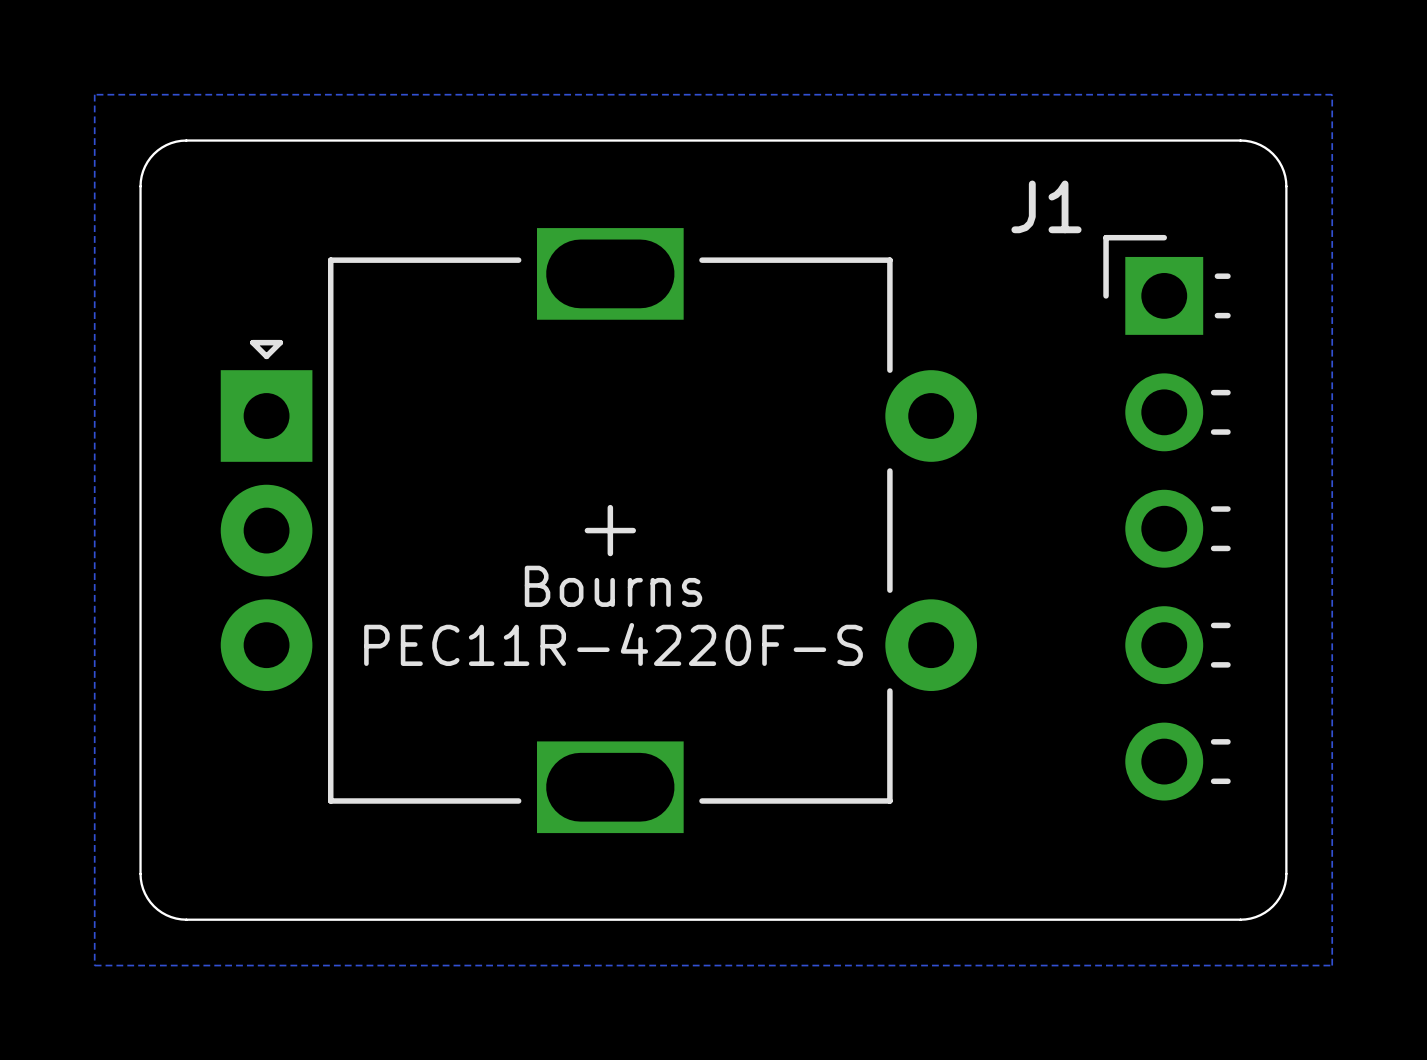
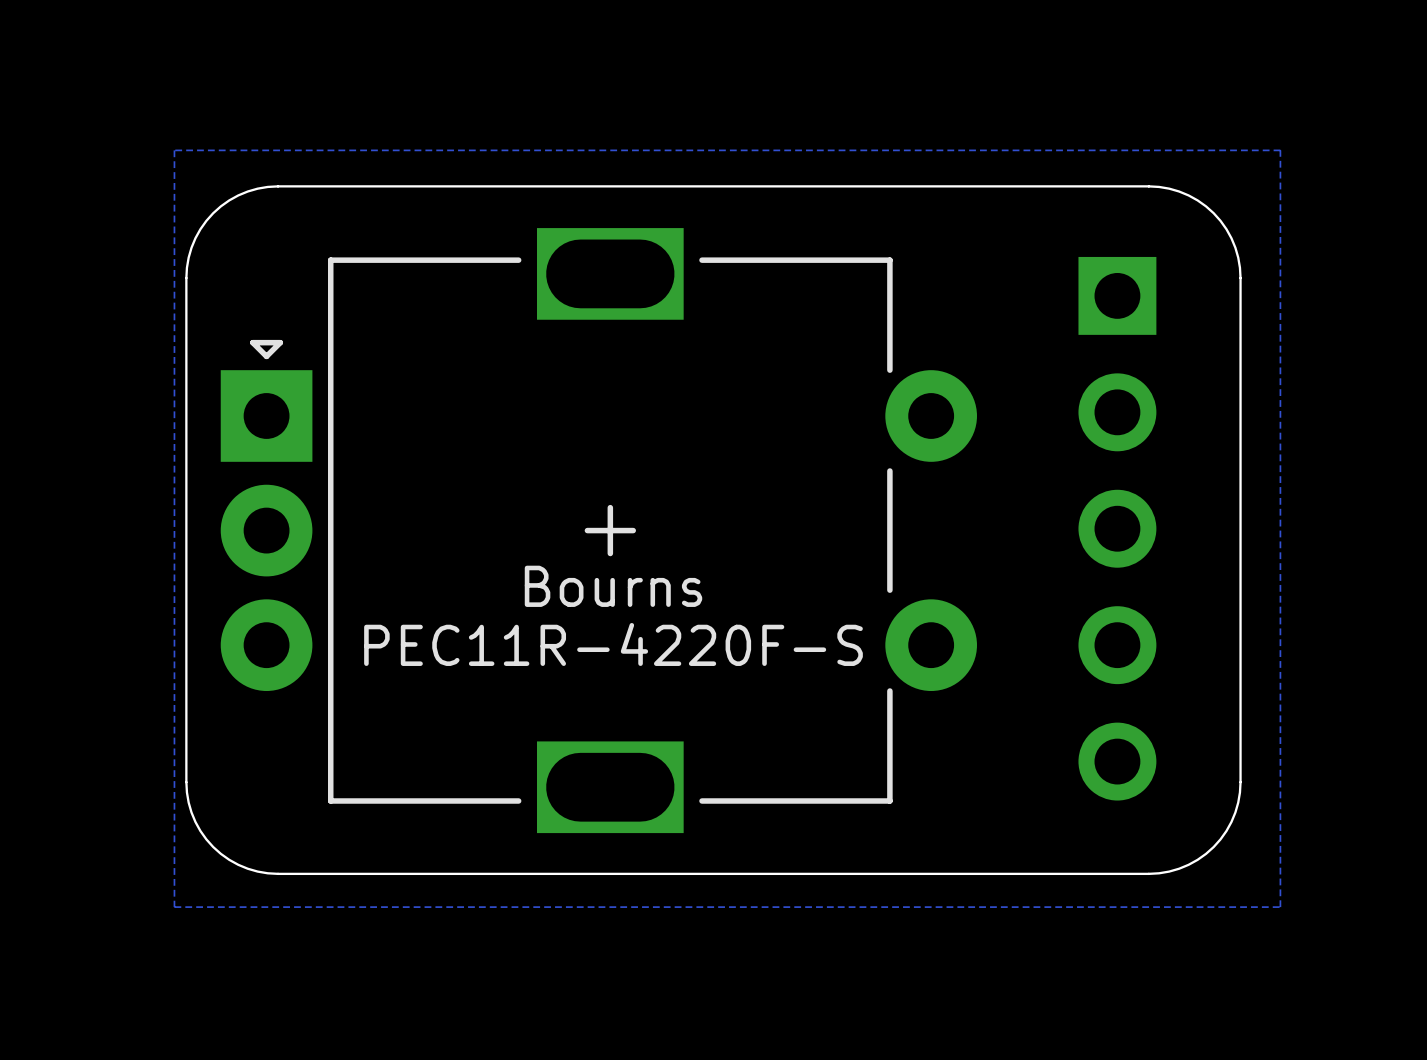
zone outline: (1332, 94) (94, 94) (94, 965) (1332, 965) (1332, 94) -> (1280, 150) (1280, 907) (174, 907) (174, 150) (1280, 150)
board edge: (1240, 140) (186, 140) (171, 143) (161, 147) (147, 161) (143, 171) (140, 186) (140, 873) (141, 884) (147, 898) (161, 912) (171, 917) (186, 919) (1240, 919) (1250, 918) (1264, 912) (1276, 902) (1281, 893) (1286, 873) (1286, 186) (1281, 166) (1272, 153) (1260, 145) (1240, 140) -> (1148, 186) (1169, 188) (1188, 195) (1213, 213) (1231, 238) (1239, 267) (1239, 792) (1235, 812) (1226, 830) (1213, 847) (1197, 859) (1169, 871) (1148, 873) (278, 873) (257, 871) (238, 864) (213, 847) (200, 830) (191, 812) (186, 782) (186, 278) (188, 257) (195, 238) (206, 220) (229, 200) (247, 191) (278, 186) (1148, 186)
J1 side: bottom (1167, 517) -> top (1117, 528)

